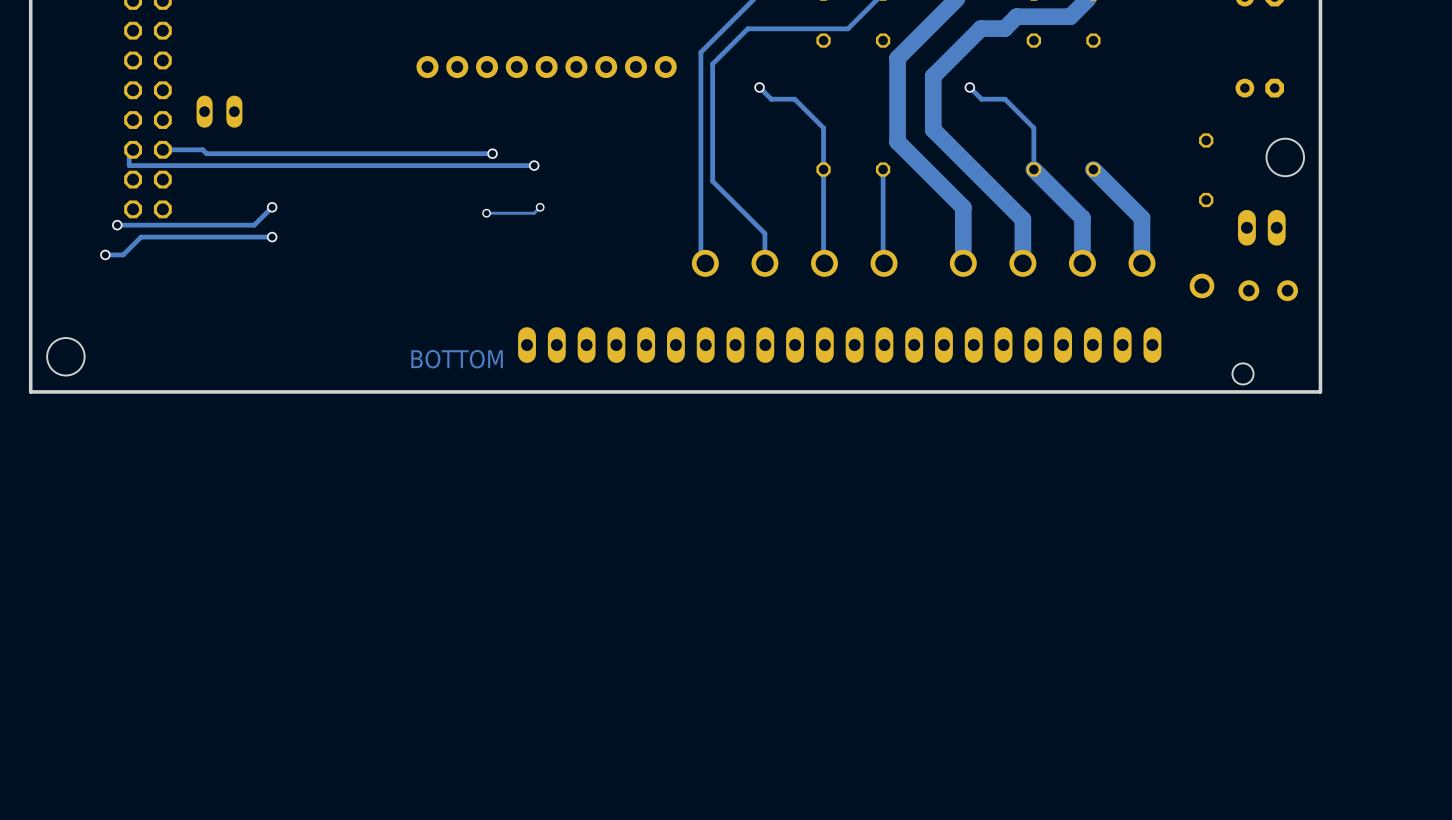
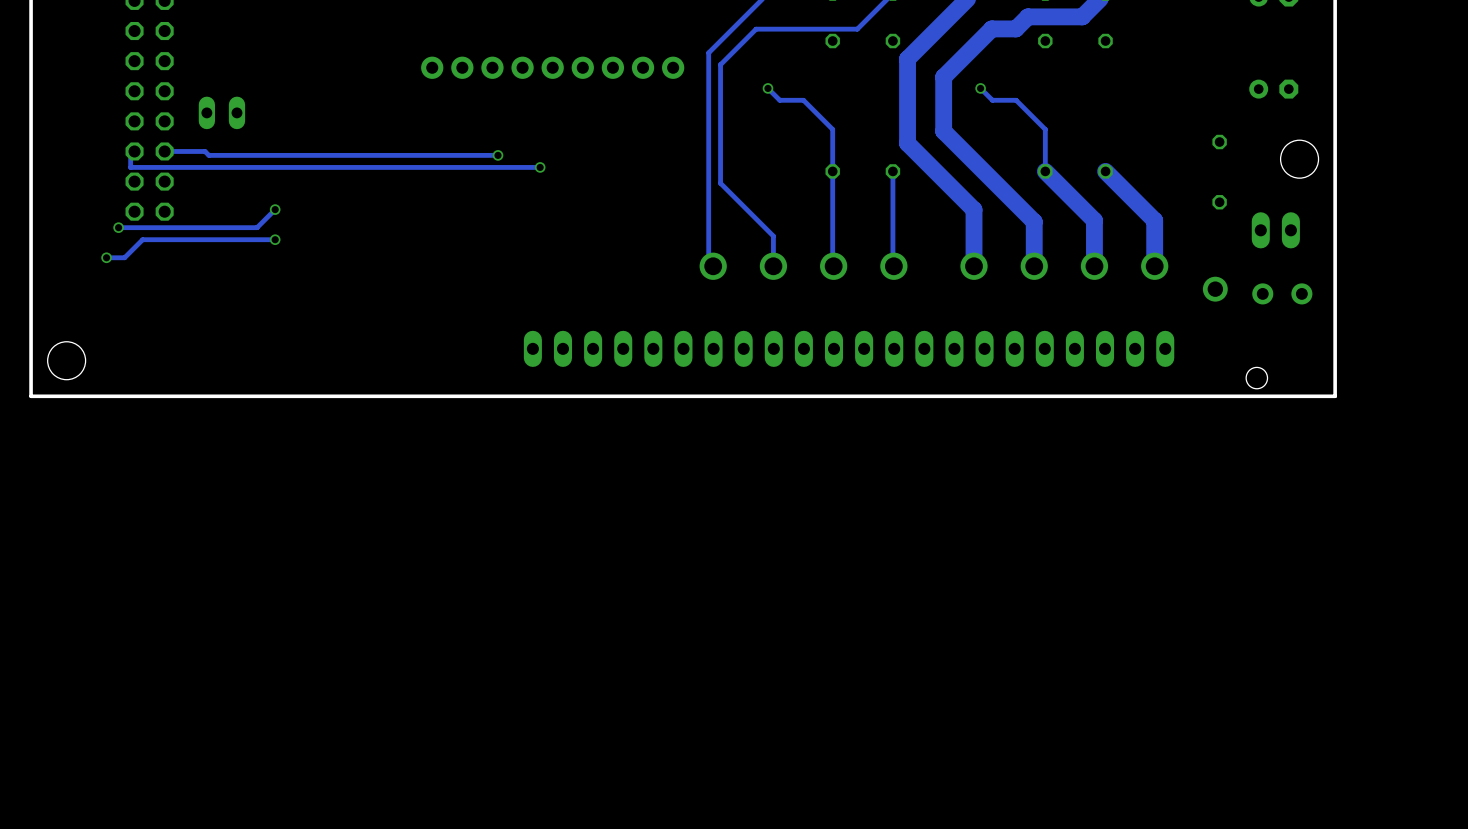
track: (540, 207) (534, 213) (486, 213) -> none
via: (540, 207) -> none
via: (486, 213) -> none
text: BOTTOM (457, 359) -> none

